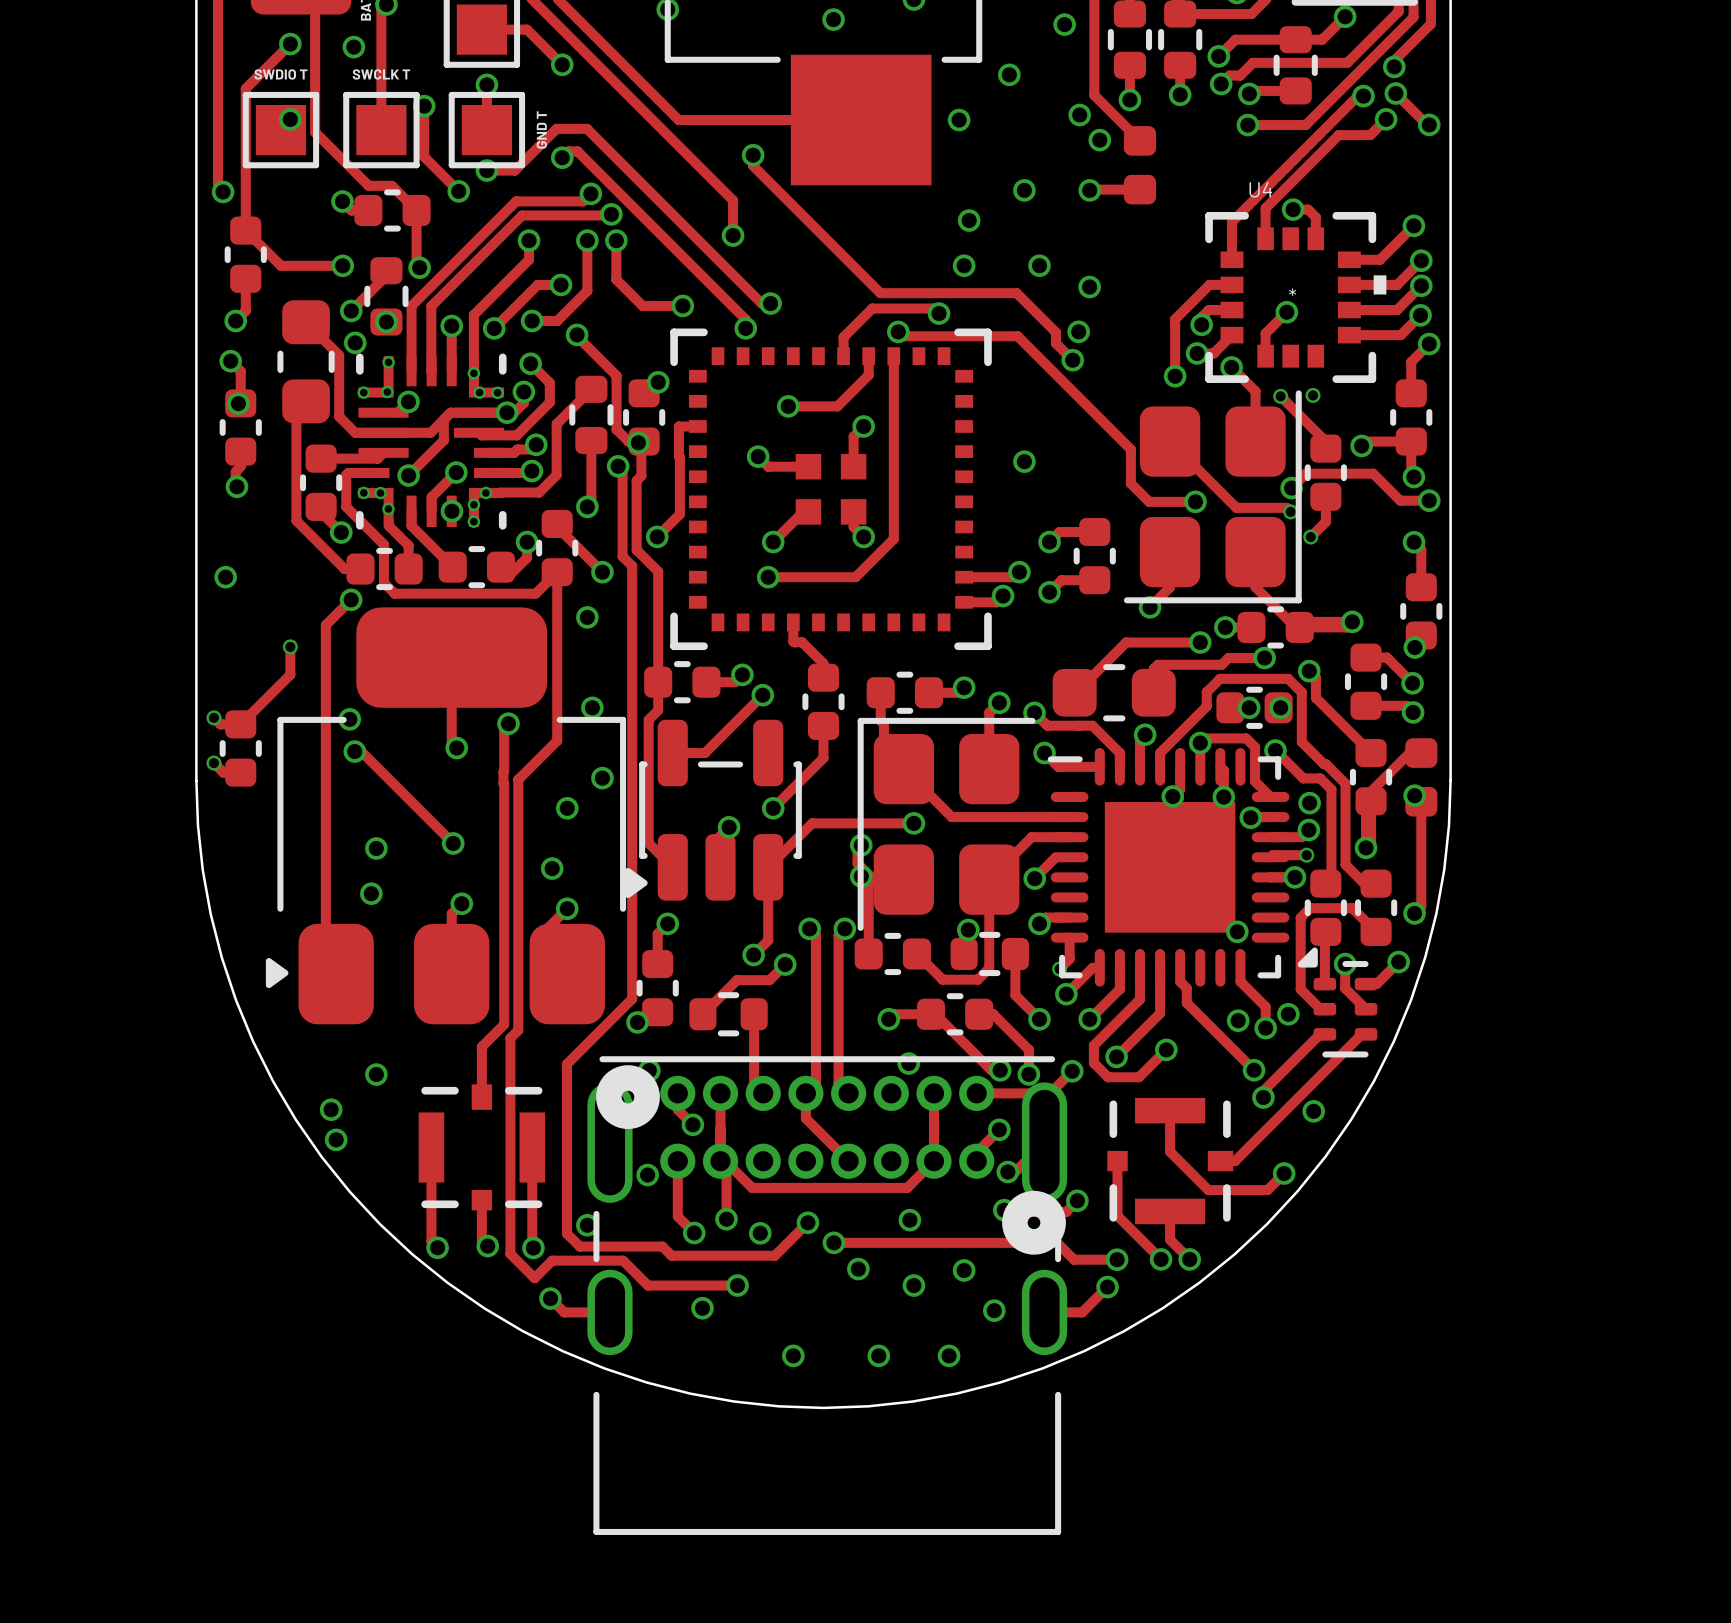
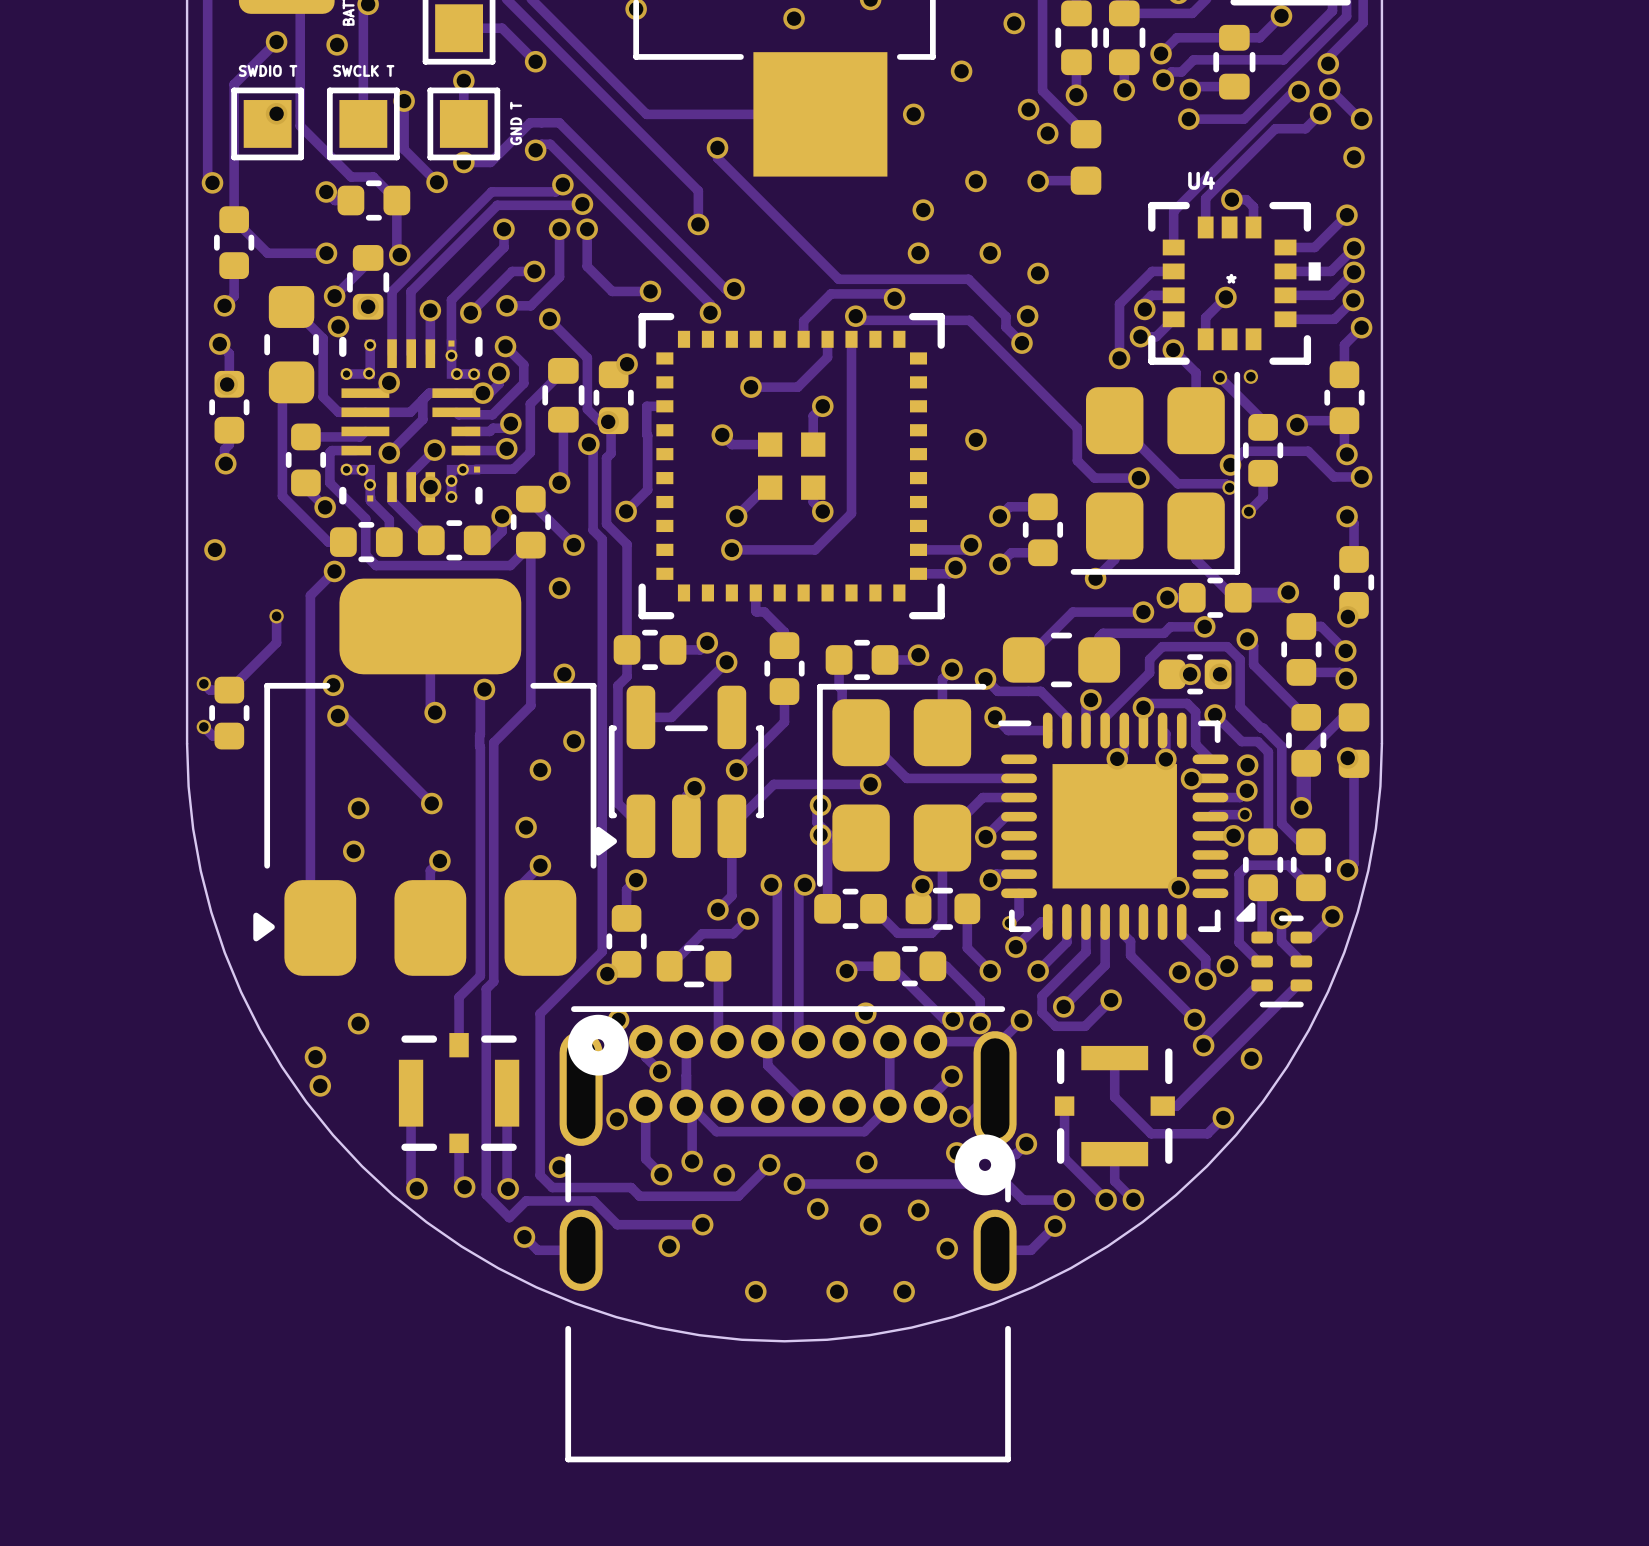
via: none -> (1354, 157)

